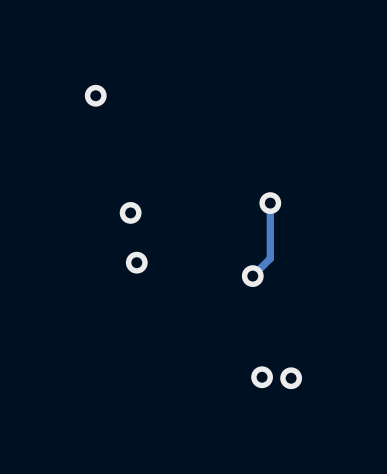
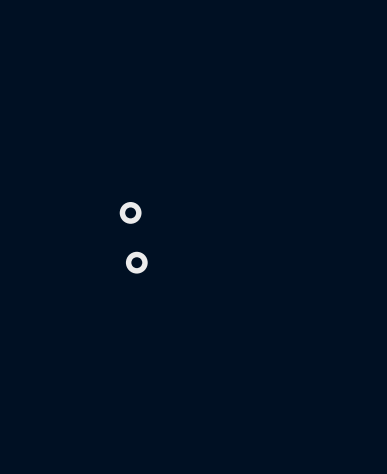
via: (95, 95) -> none
track: (270, 203) (270, 258) (252, 276) -> none
via: (270, 203) -> none
via: (252, 276) -> none
via: (262, 377) -> none
via: (291, 378) -> none

